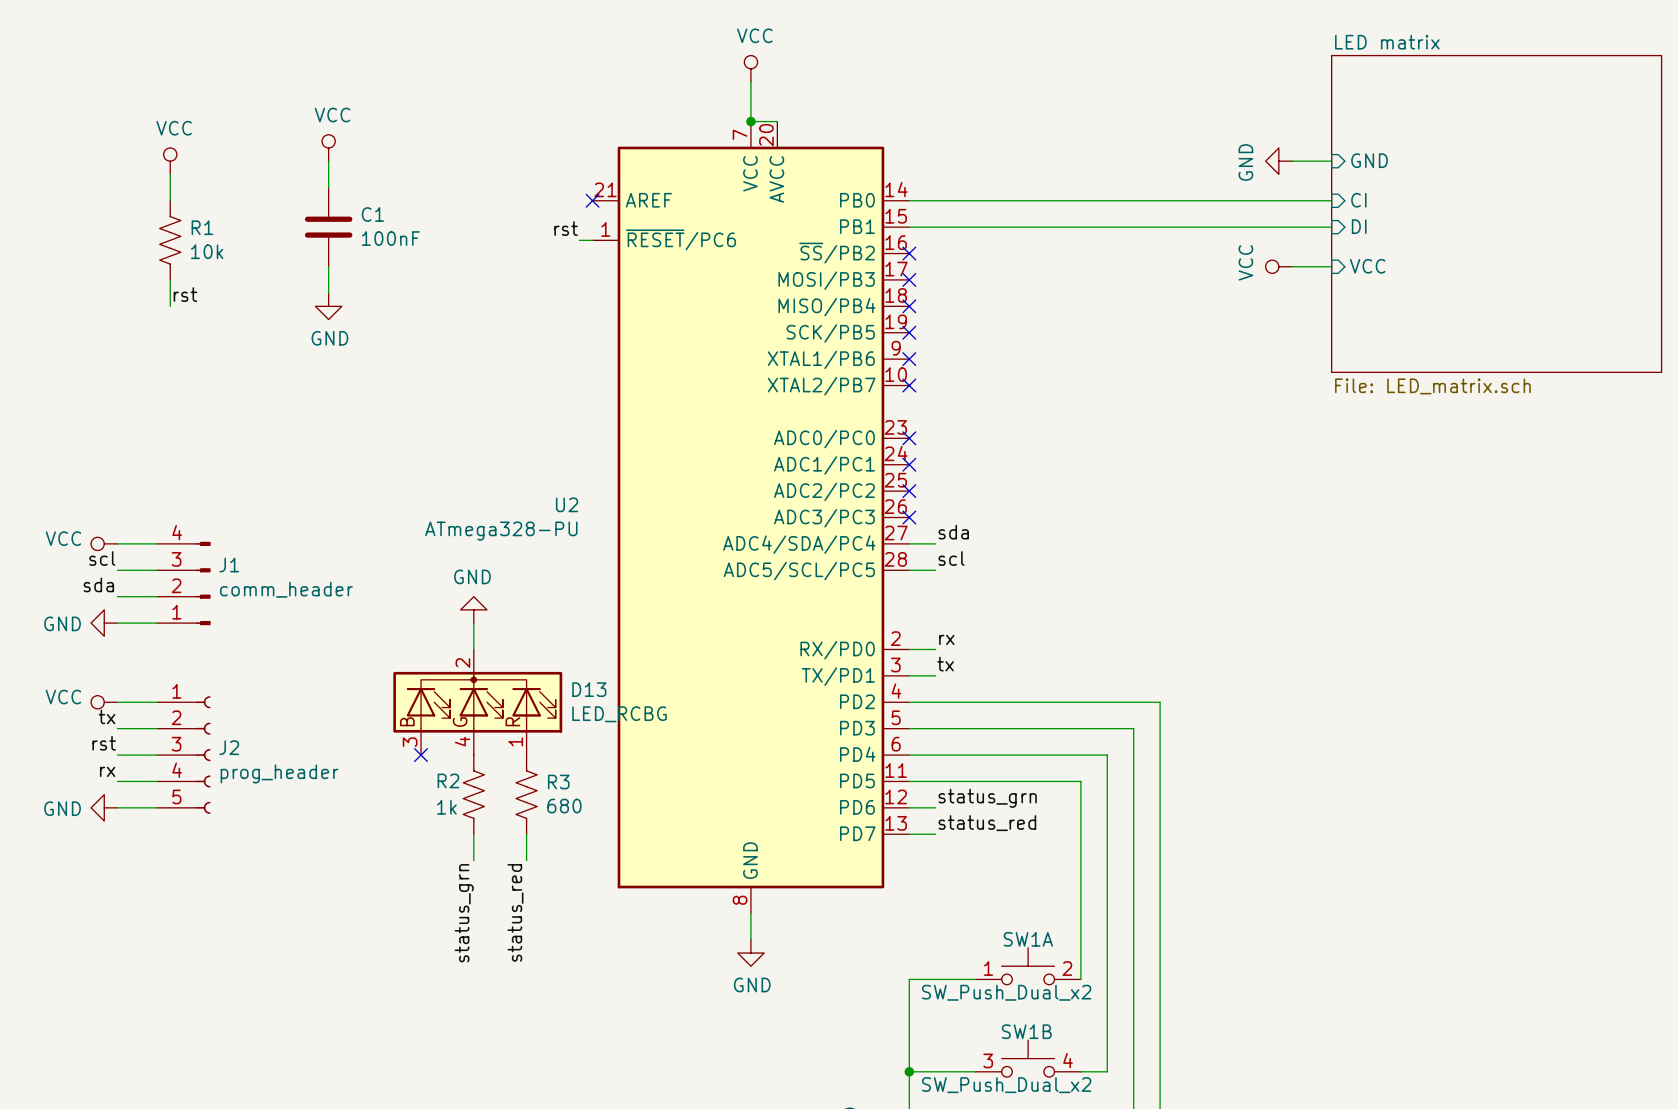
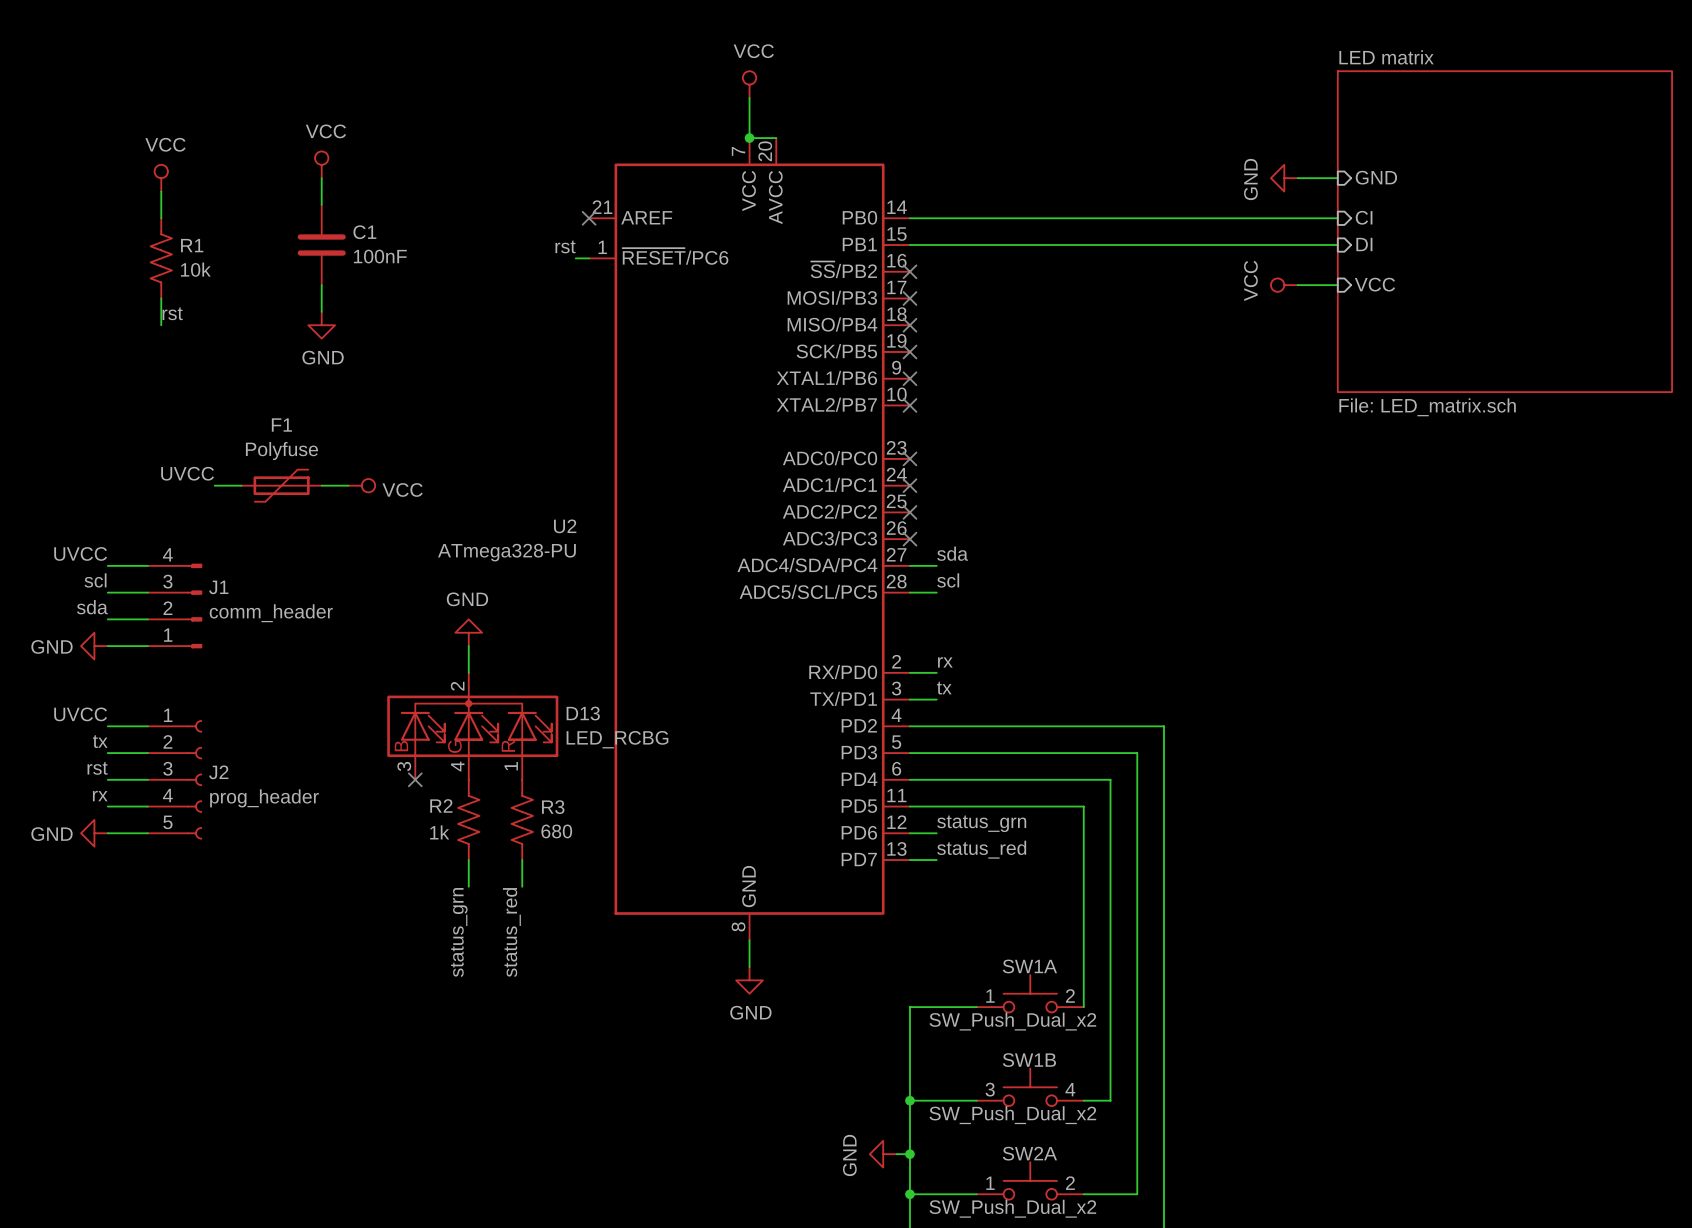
label: none -> UVCC (187, 473)
wire: none -> (214, 485) (241, 485)
F1: none -> Polyfuse (281, 485)
wire: none -> (321, 485) (348, 485)
power symbol: none -> VCC (361, 485)
label: none -> UVCC (80, 553)
power symbol: VCC (104, 543) -> none
label: none -> UVCC (80, 714)
power symbol: VCC (104, 702) -> none

